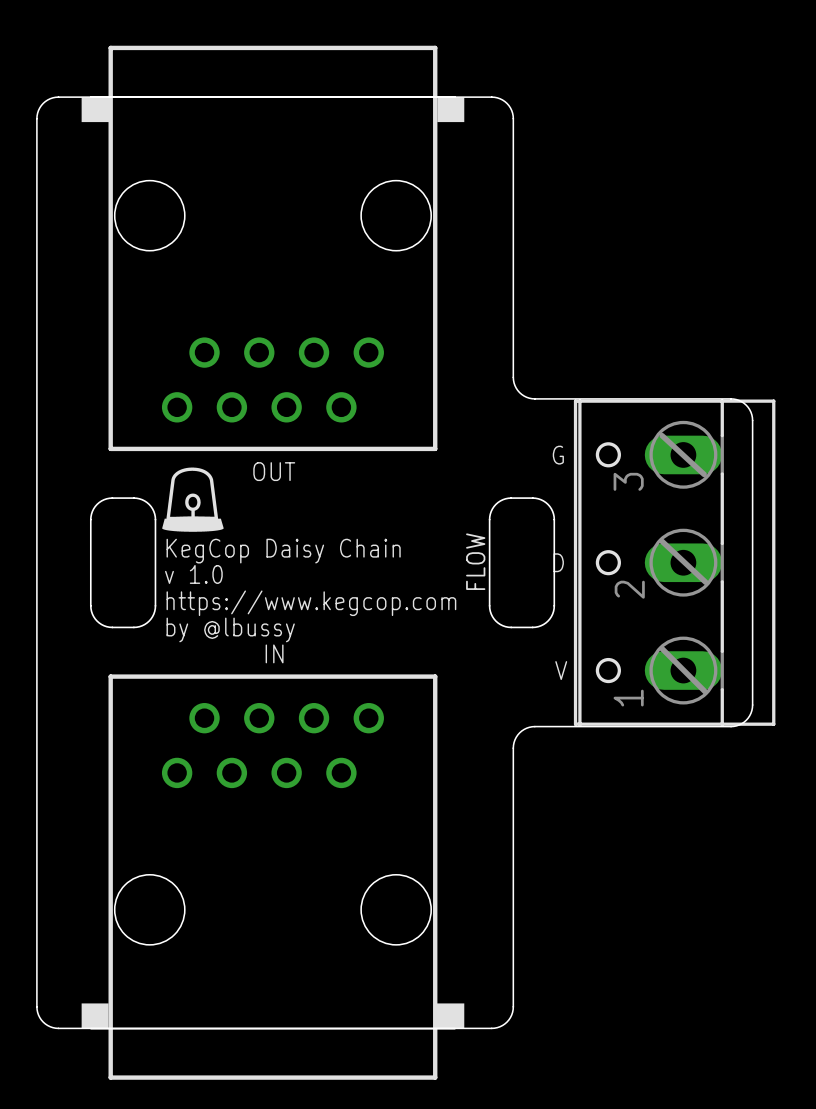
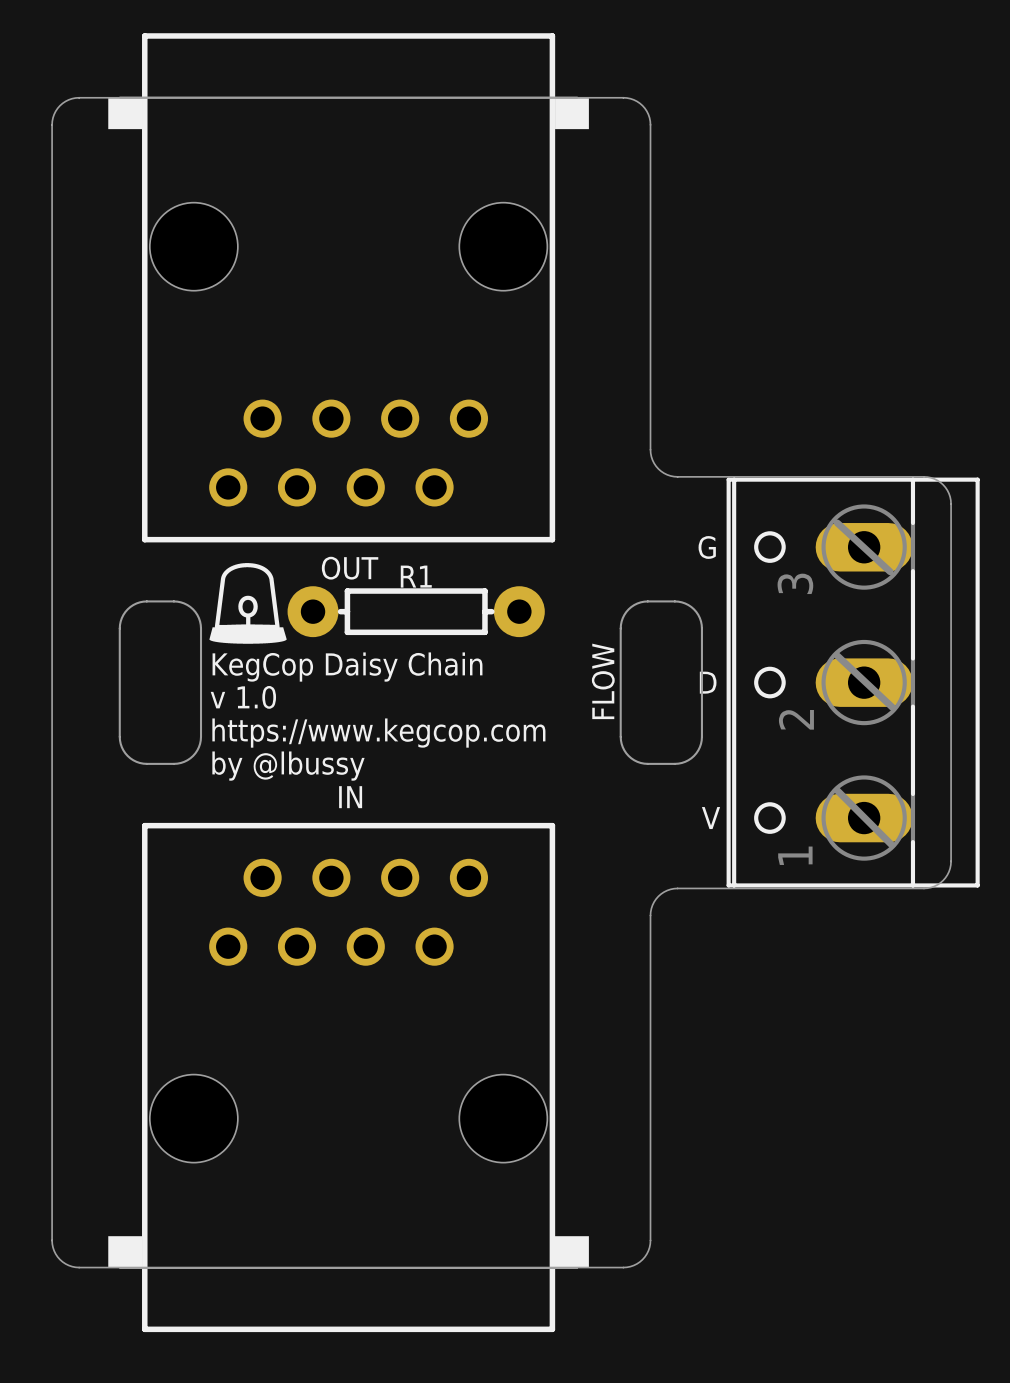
R1: none -> (416, 611)

